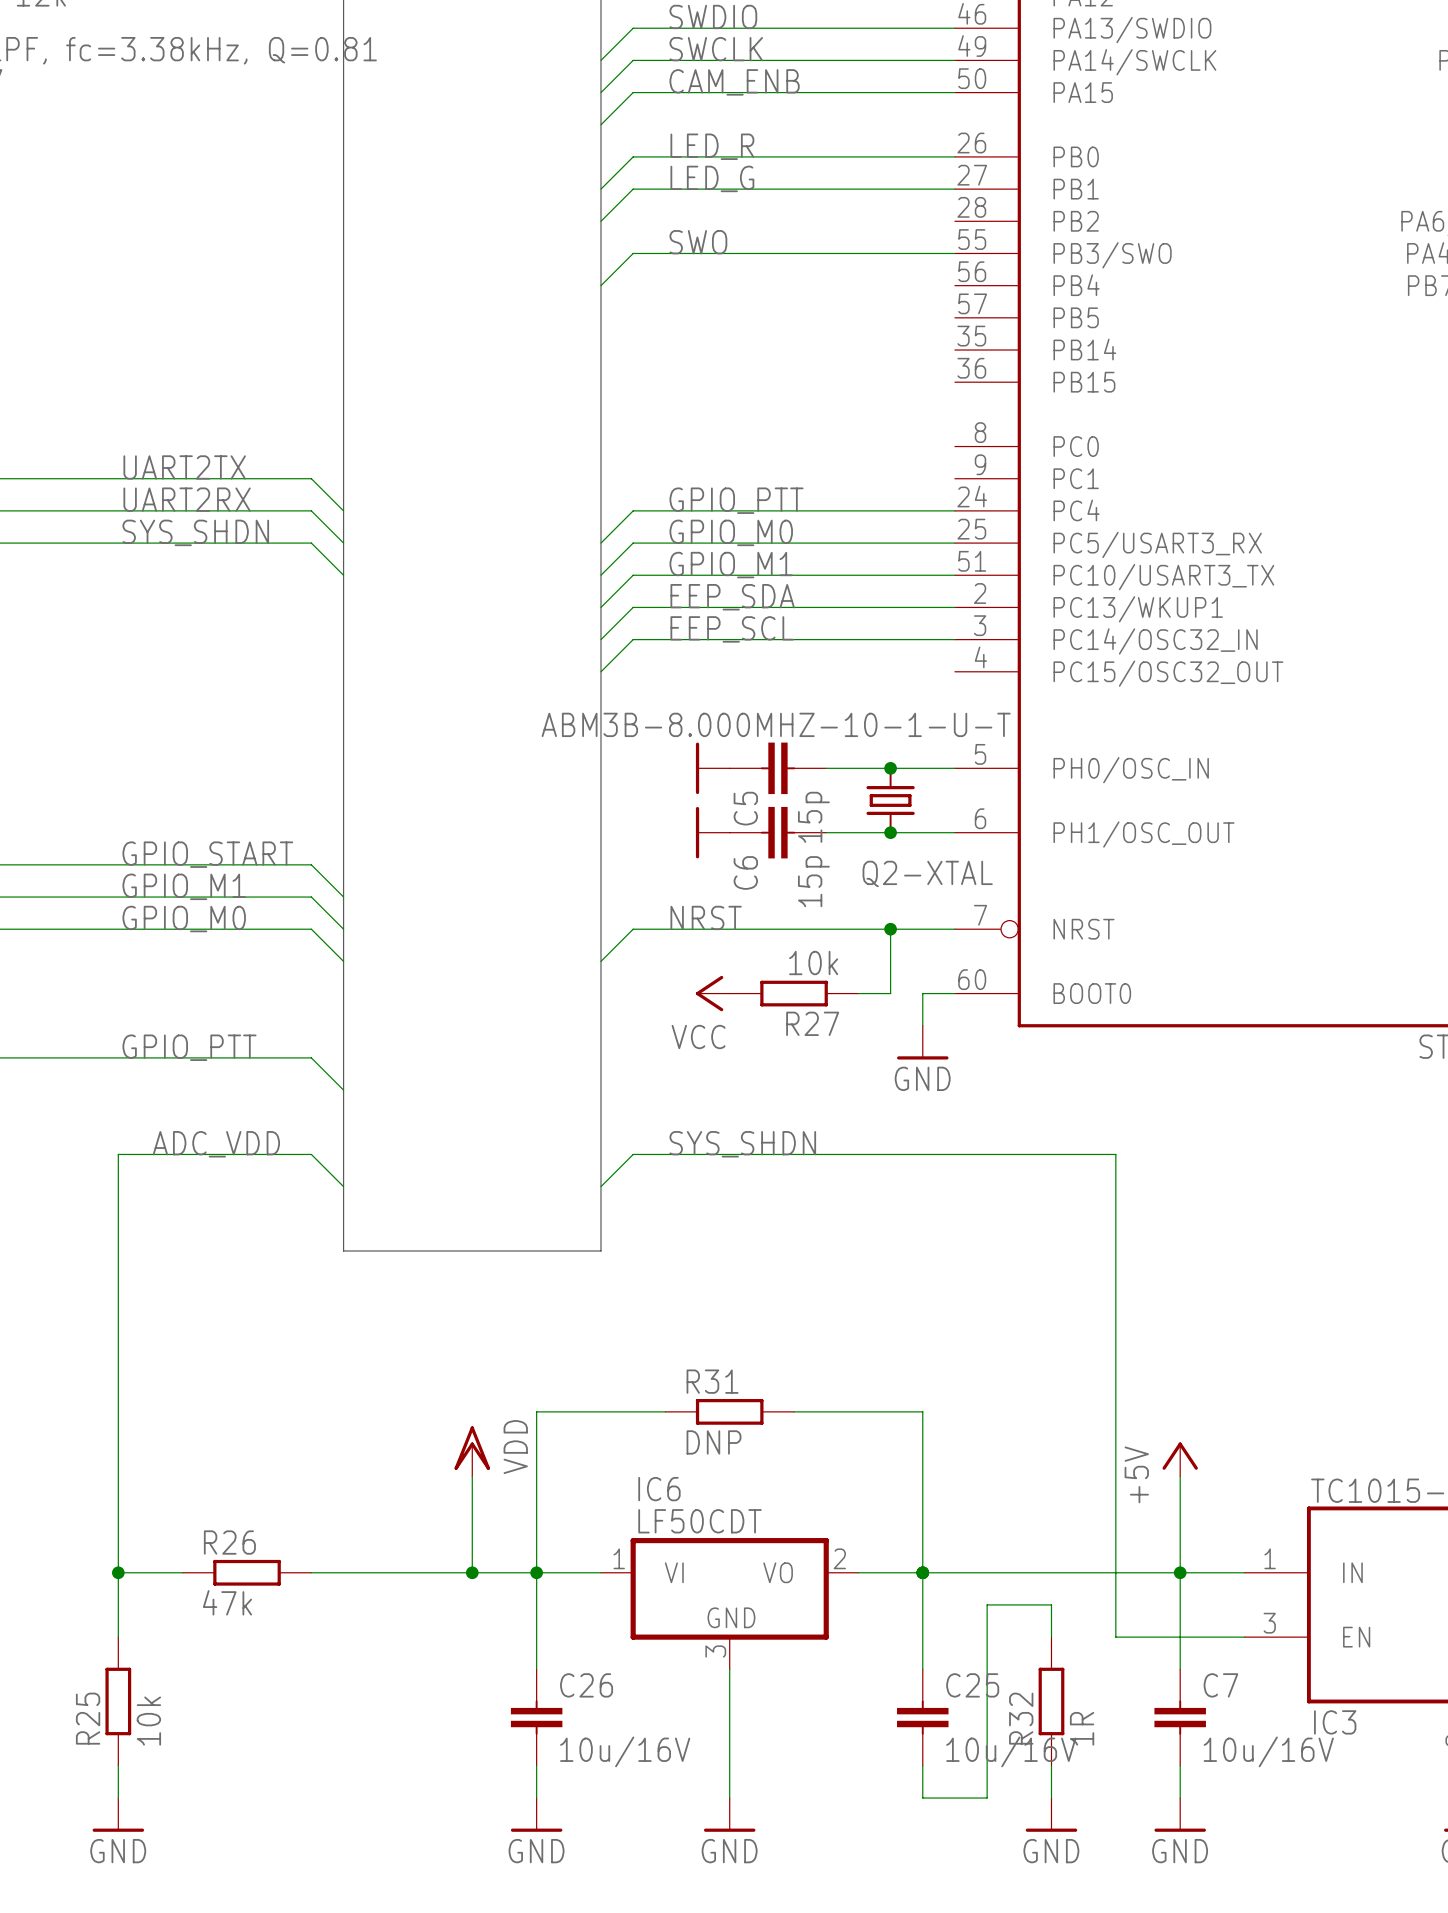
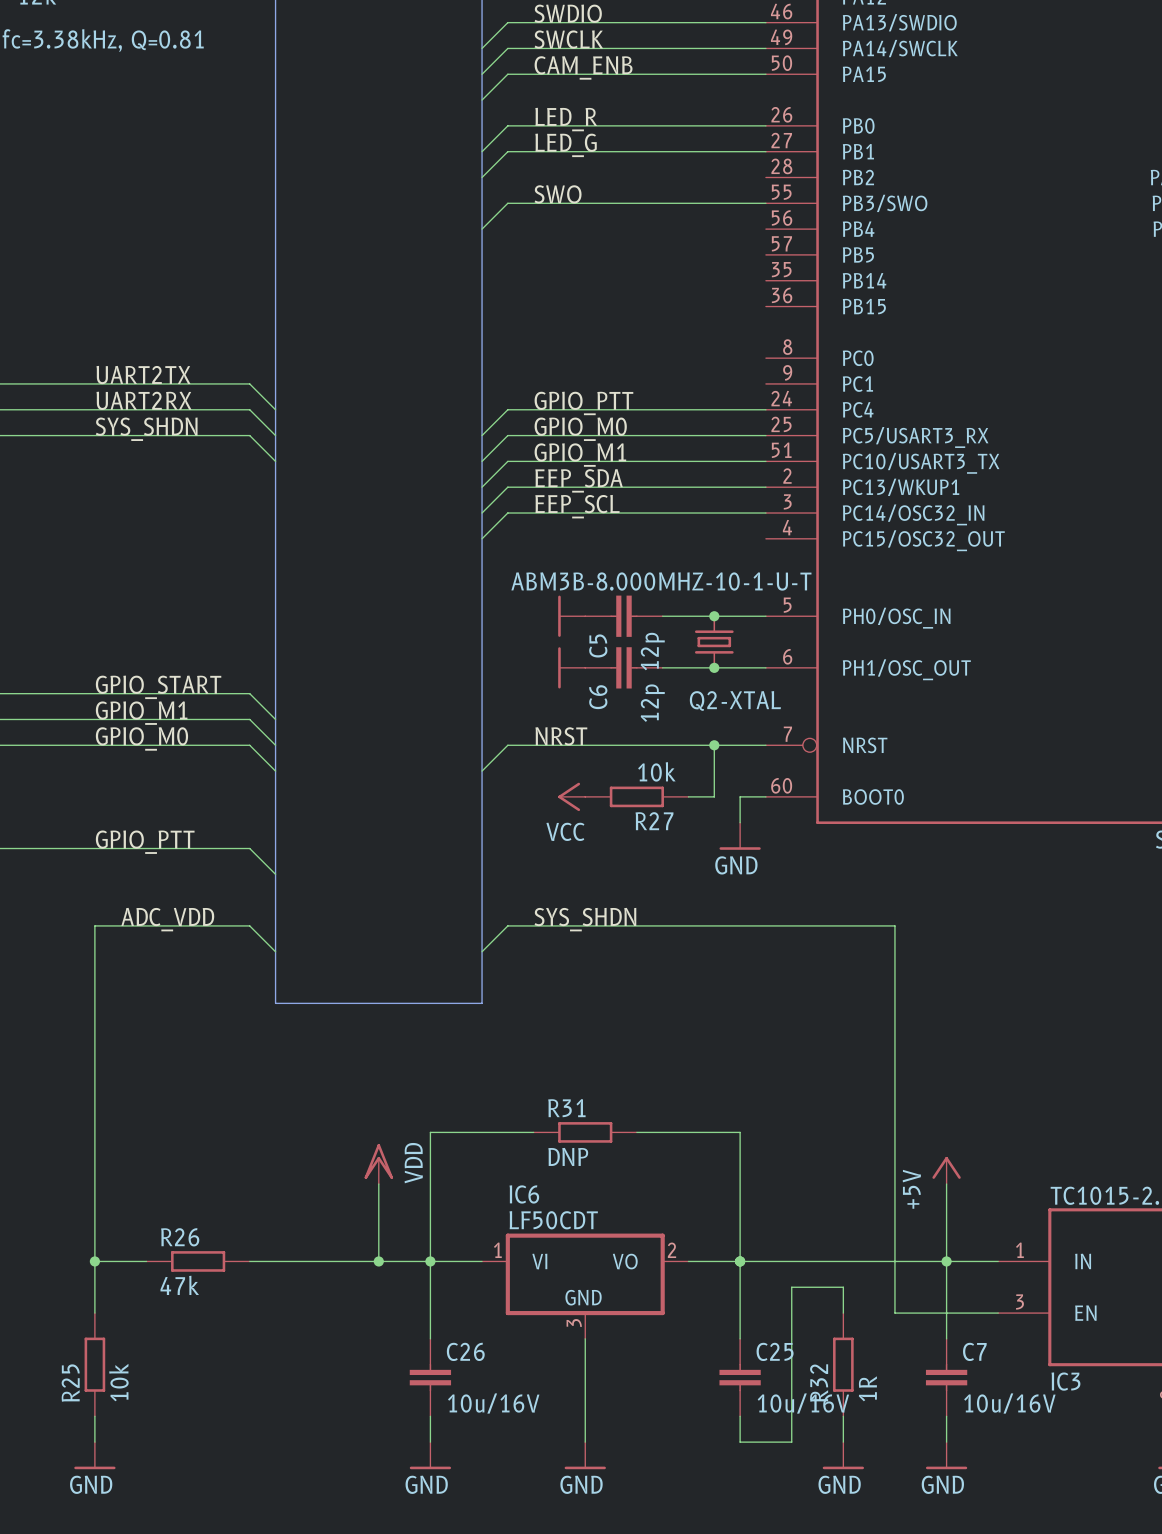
C5 value: 15p (813, 817) -> 12p (652, 651)
C6 value: 15p (813, 881) -> 12p (652, 703)

